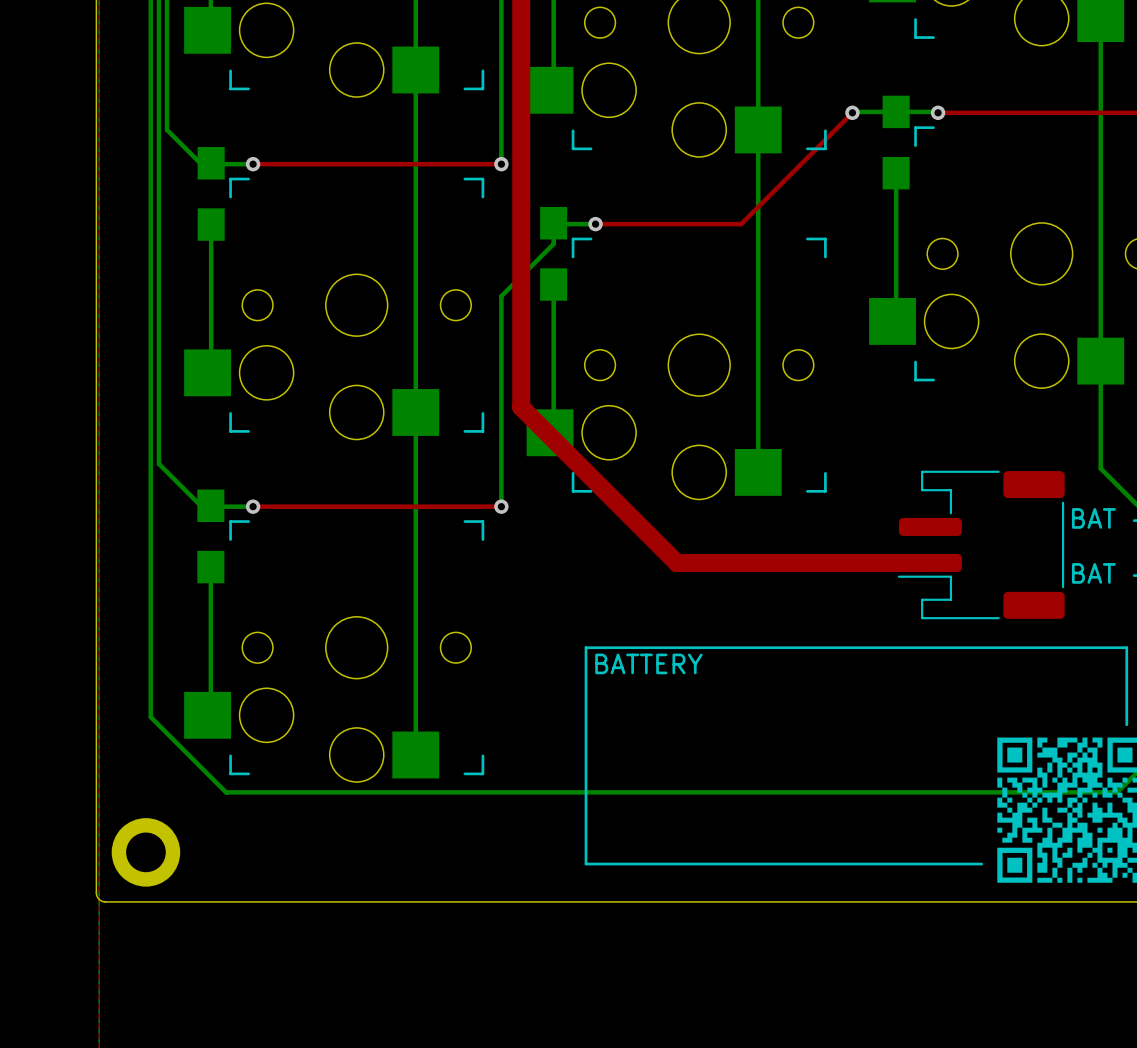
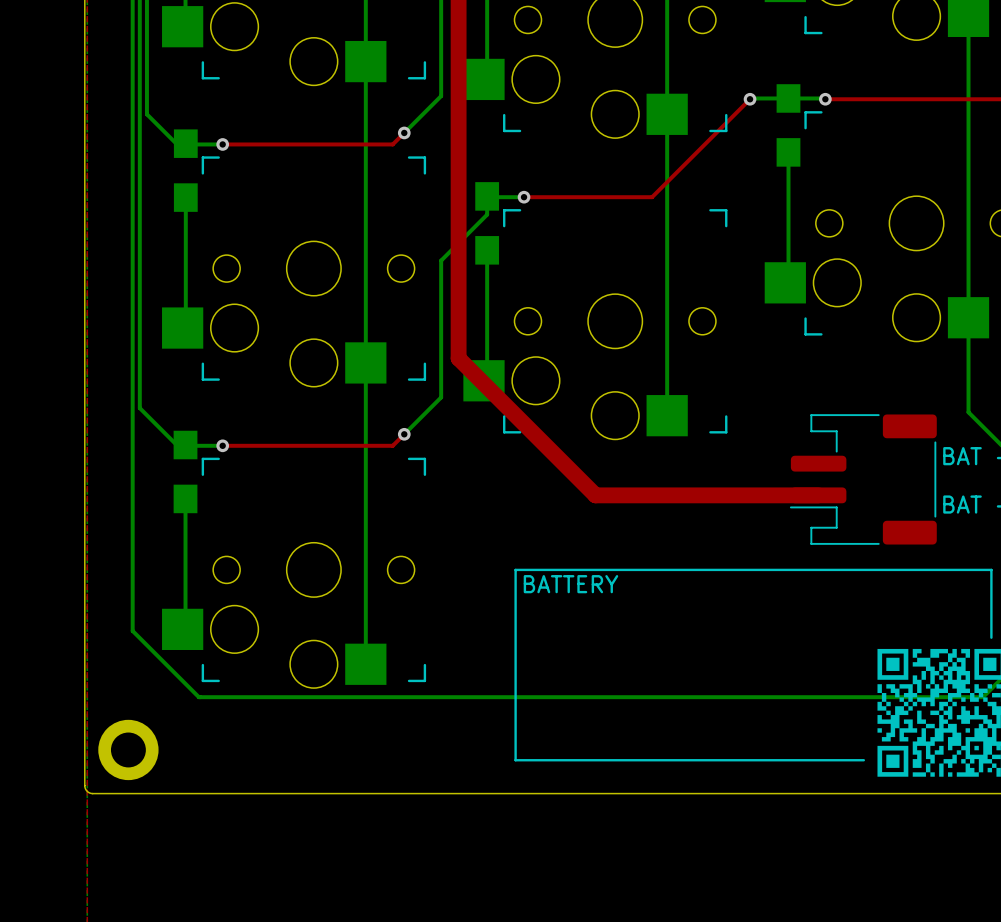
bottom track: (501, 109) (501, 164) -> (441, 96) (404, 132)
top track: (446, 164) (501, 164) -> (392, 144) (404, 132)
via position: (501, 164) -> (404, 132)
bottom track: (501, 451) (501, 506) -> (441, 397) (404, 434)
top track: (446, 506) (501, 506) -> (392, 445) (404, 434)
via position: (501, 506) -> (404, 434)

